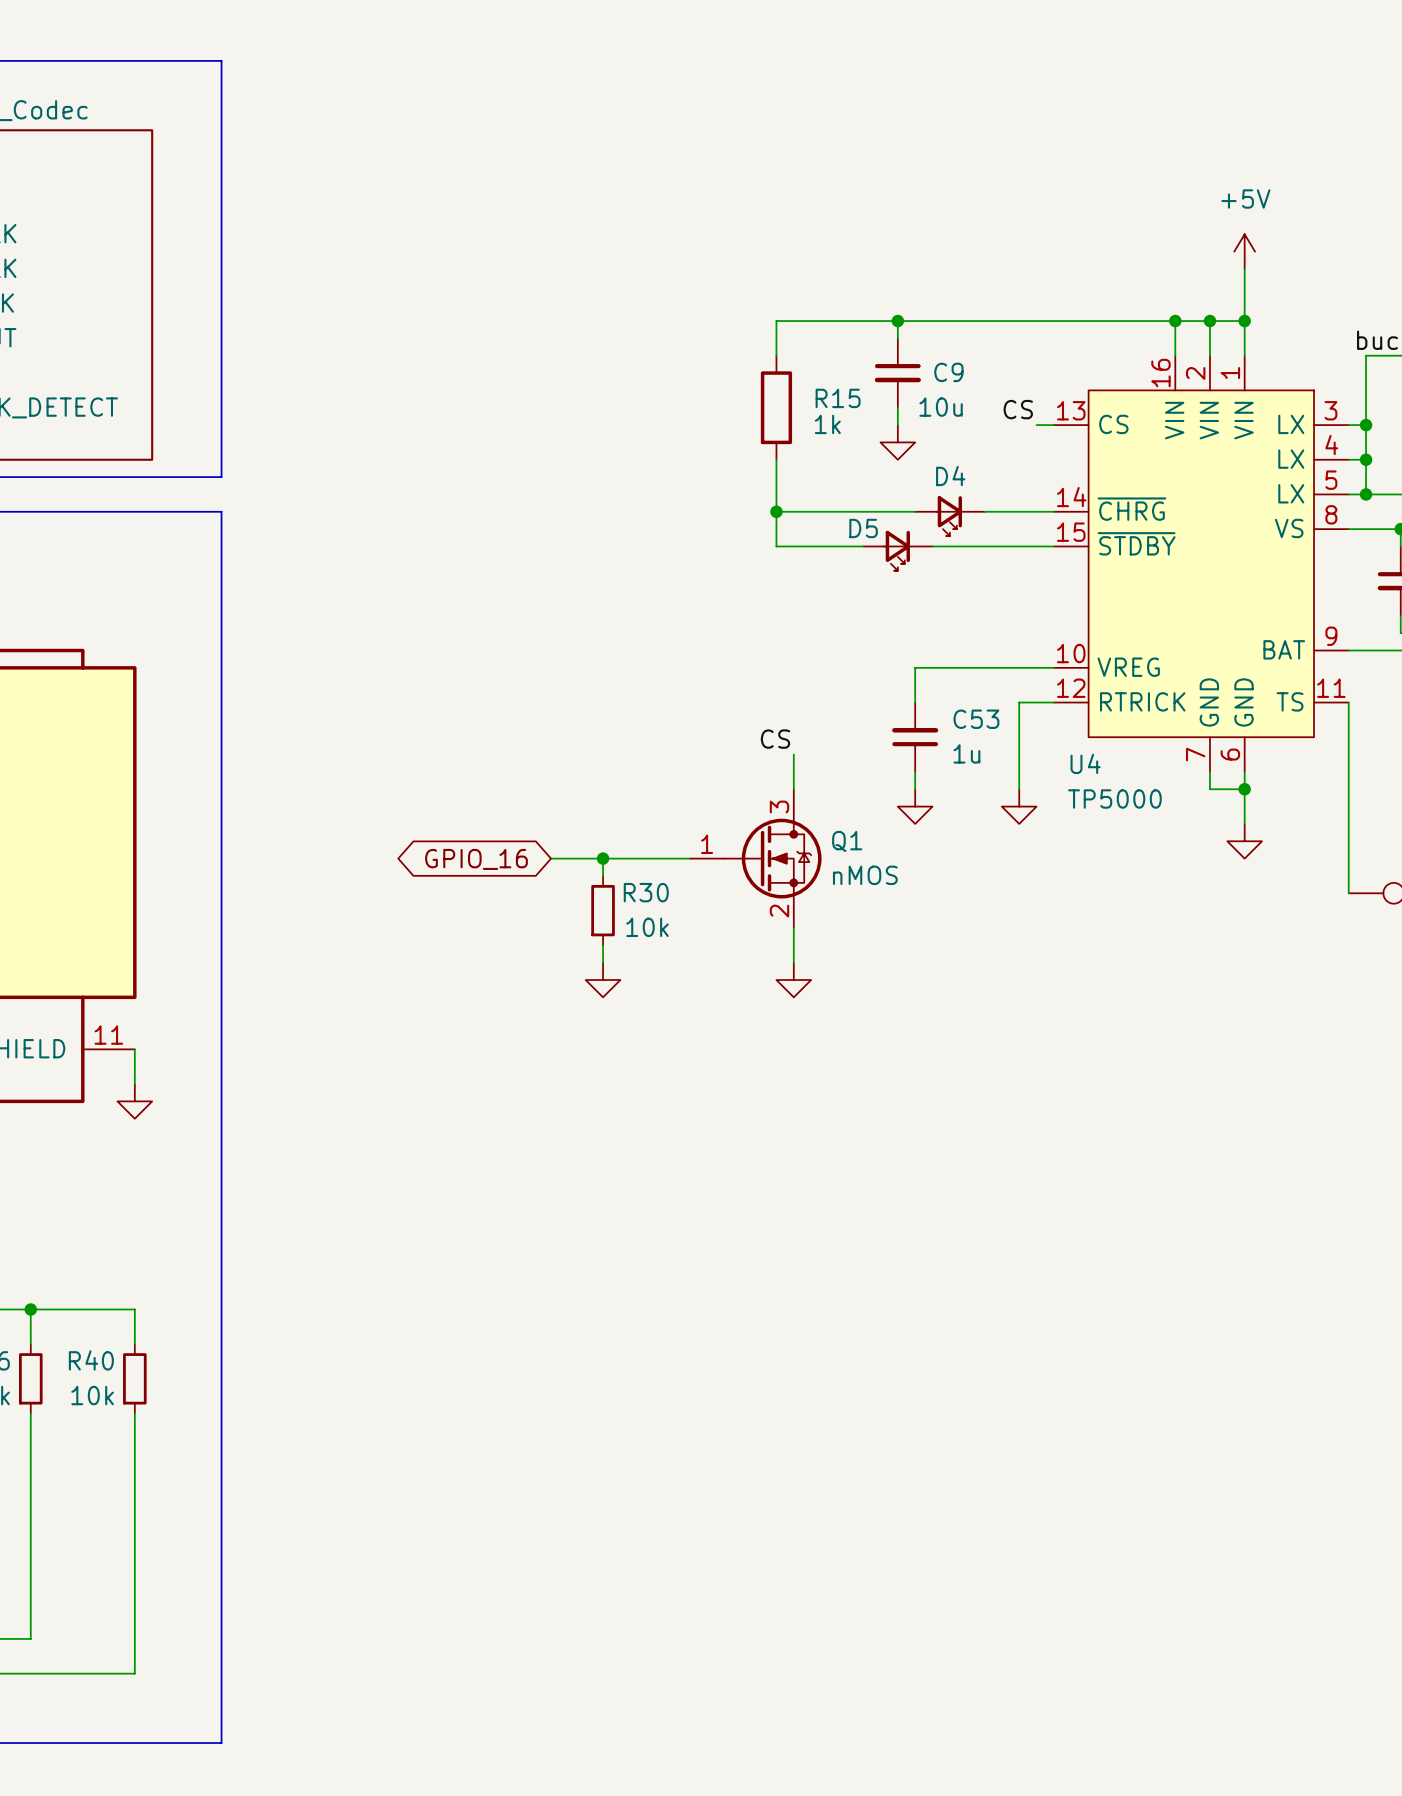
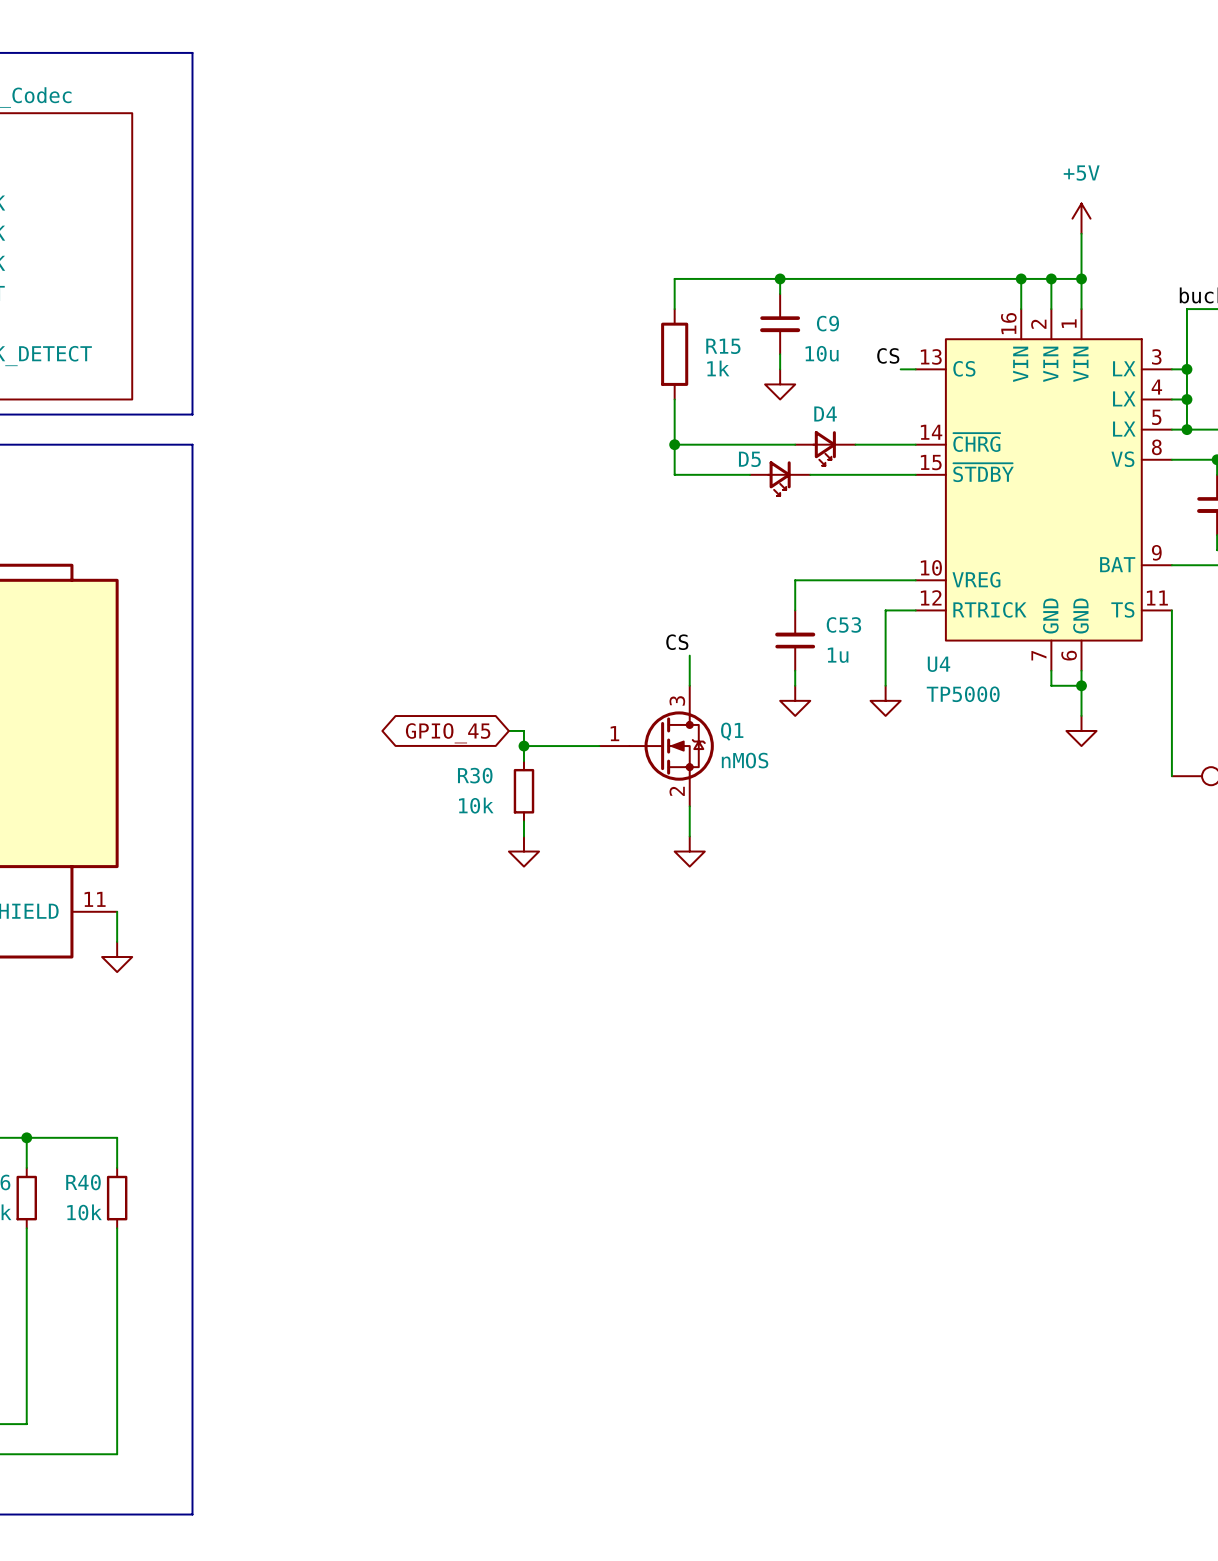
wire: (551, 858) (603, 858) -> (508, 730) (523, 730) (523, 746)
global label: GPIO_16 (476, 859) -> GPIO_45 (448, 733)
R30 name position: R30 (646, 892) -> R30 (475, 775)
R30 value position: 10k (647, 927) -> 10k (476, 805)

